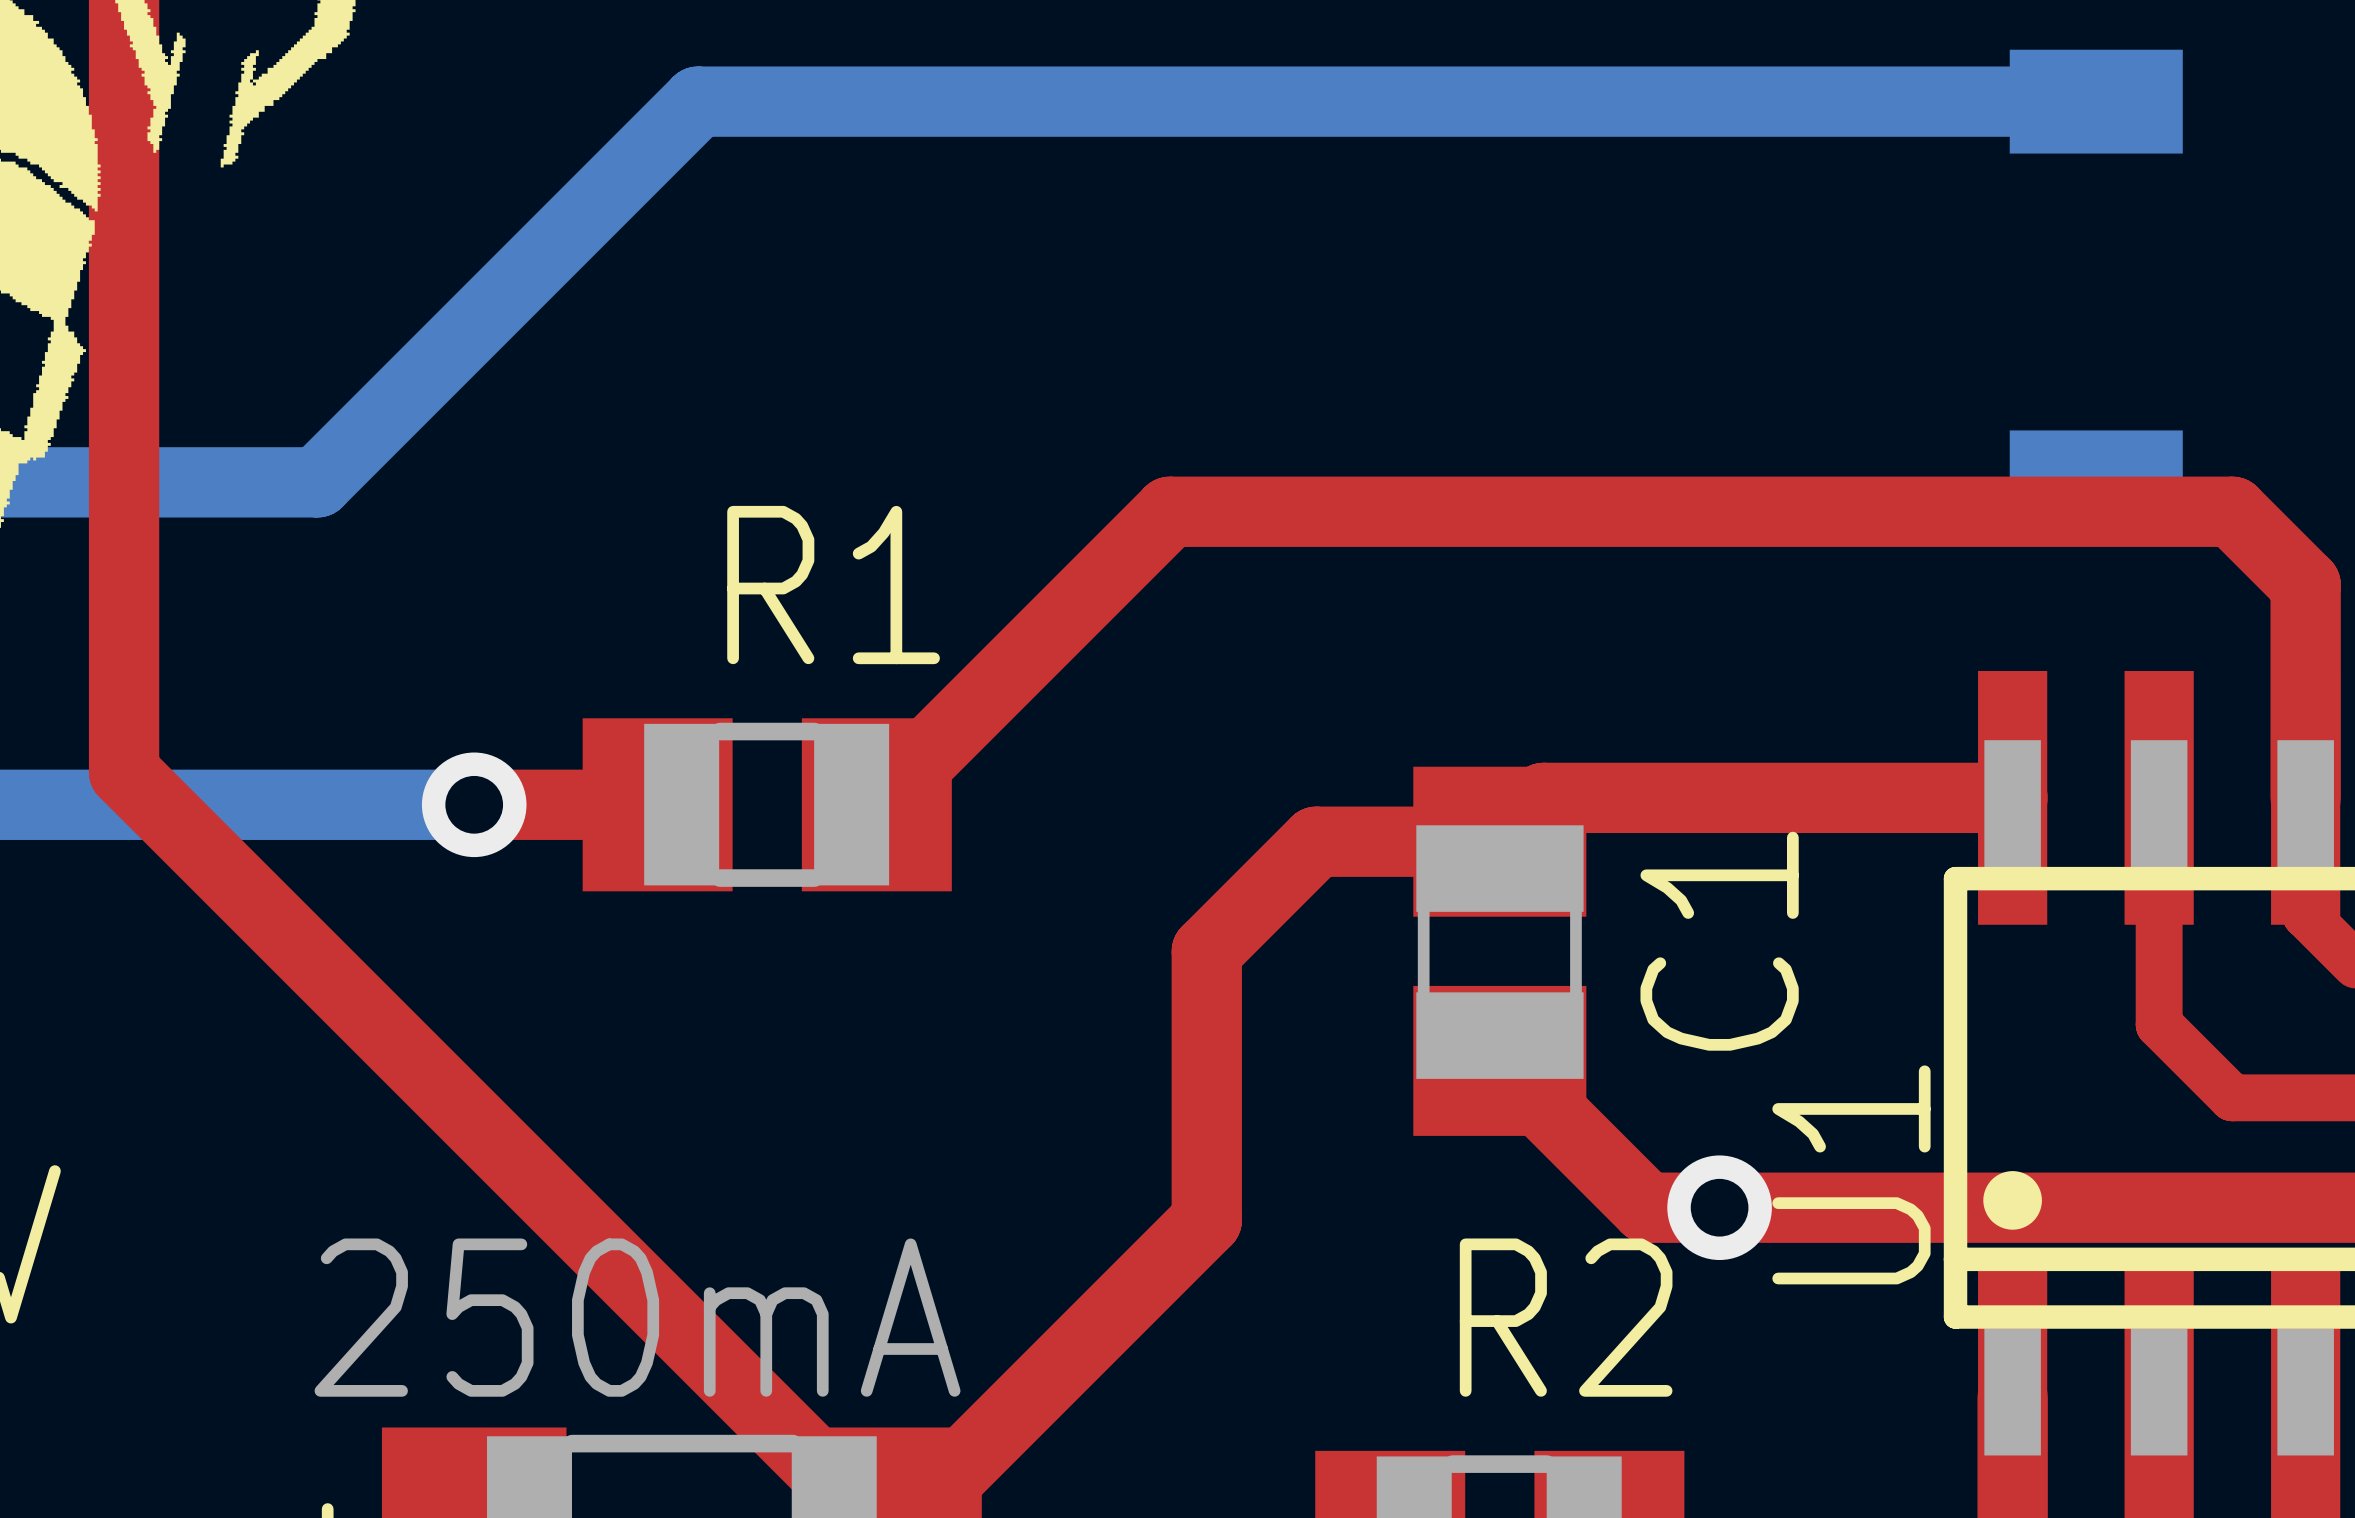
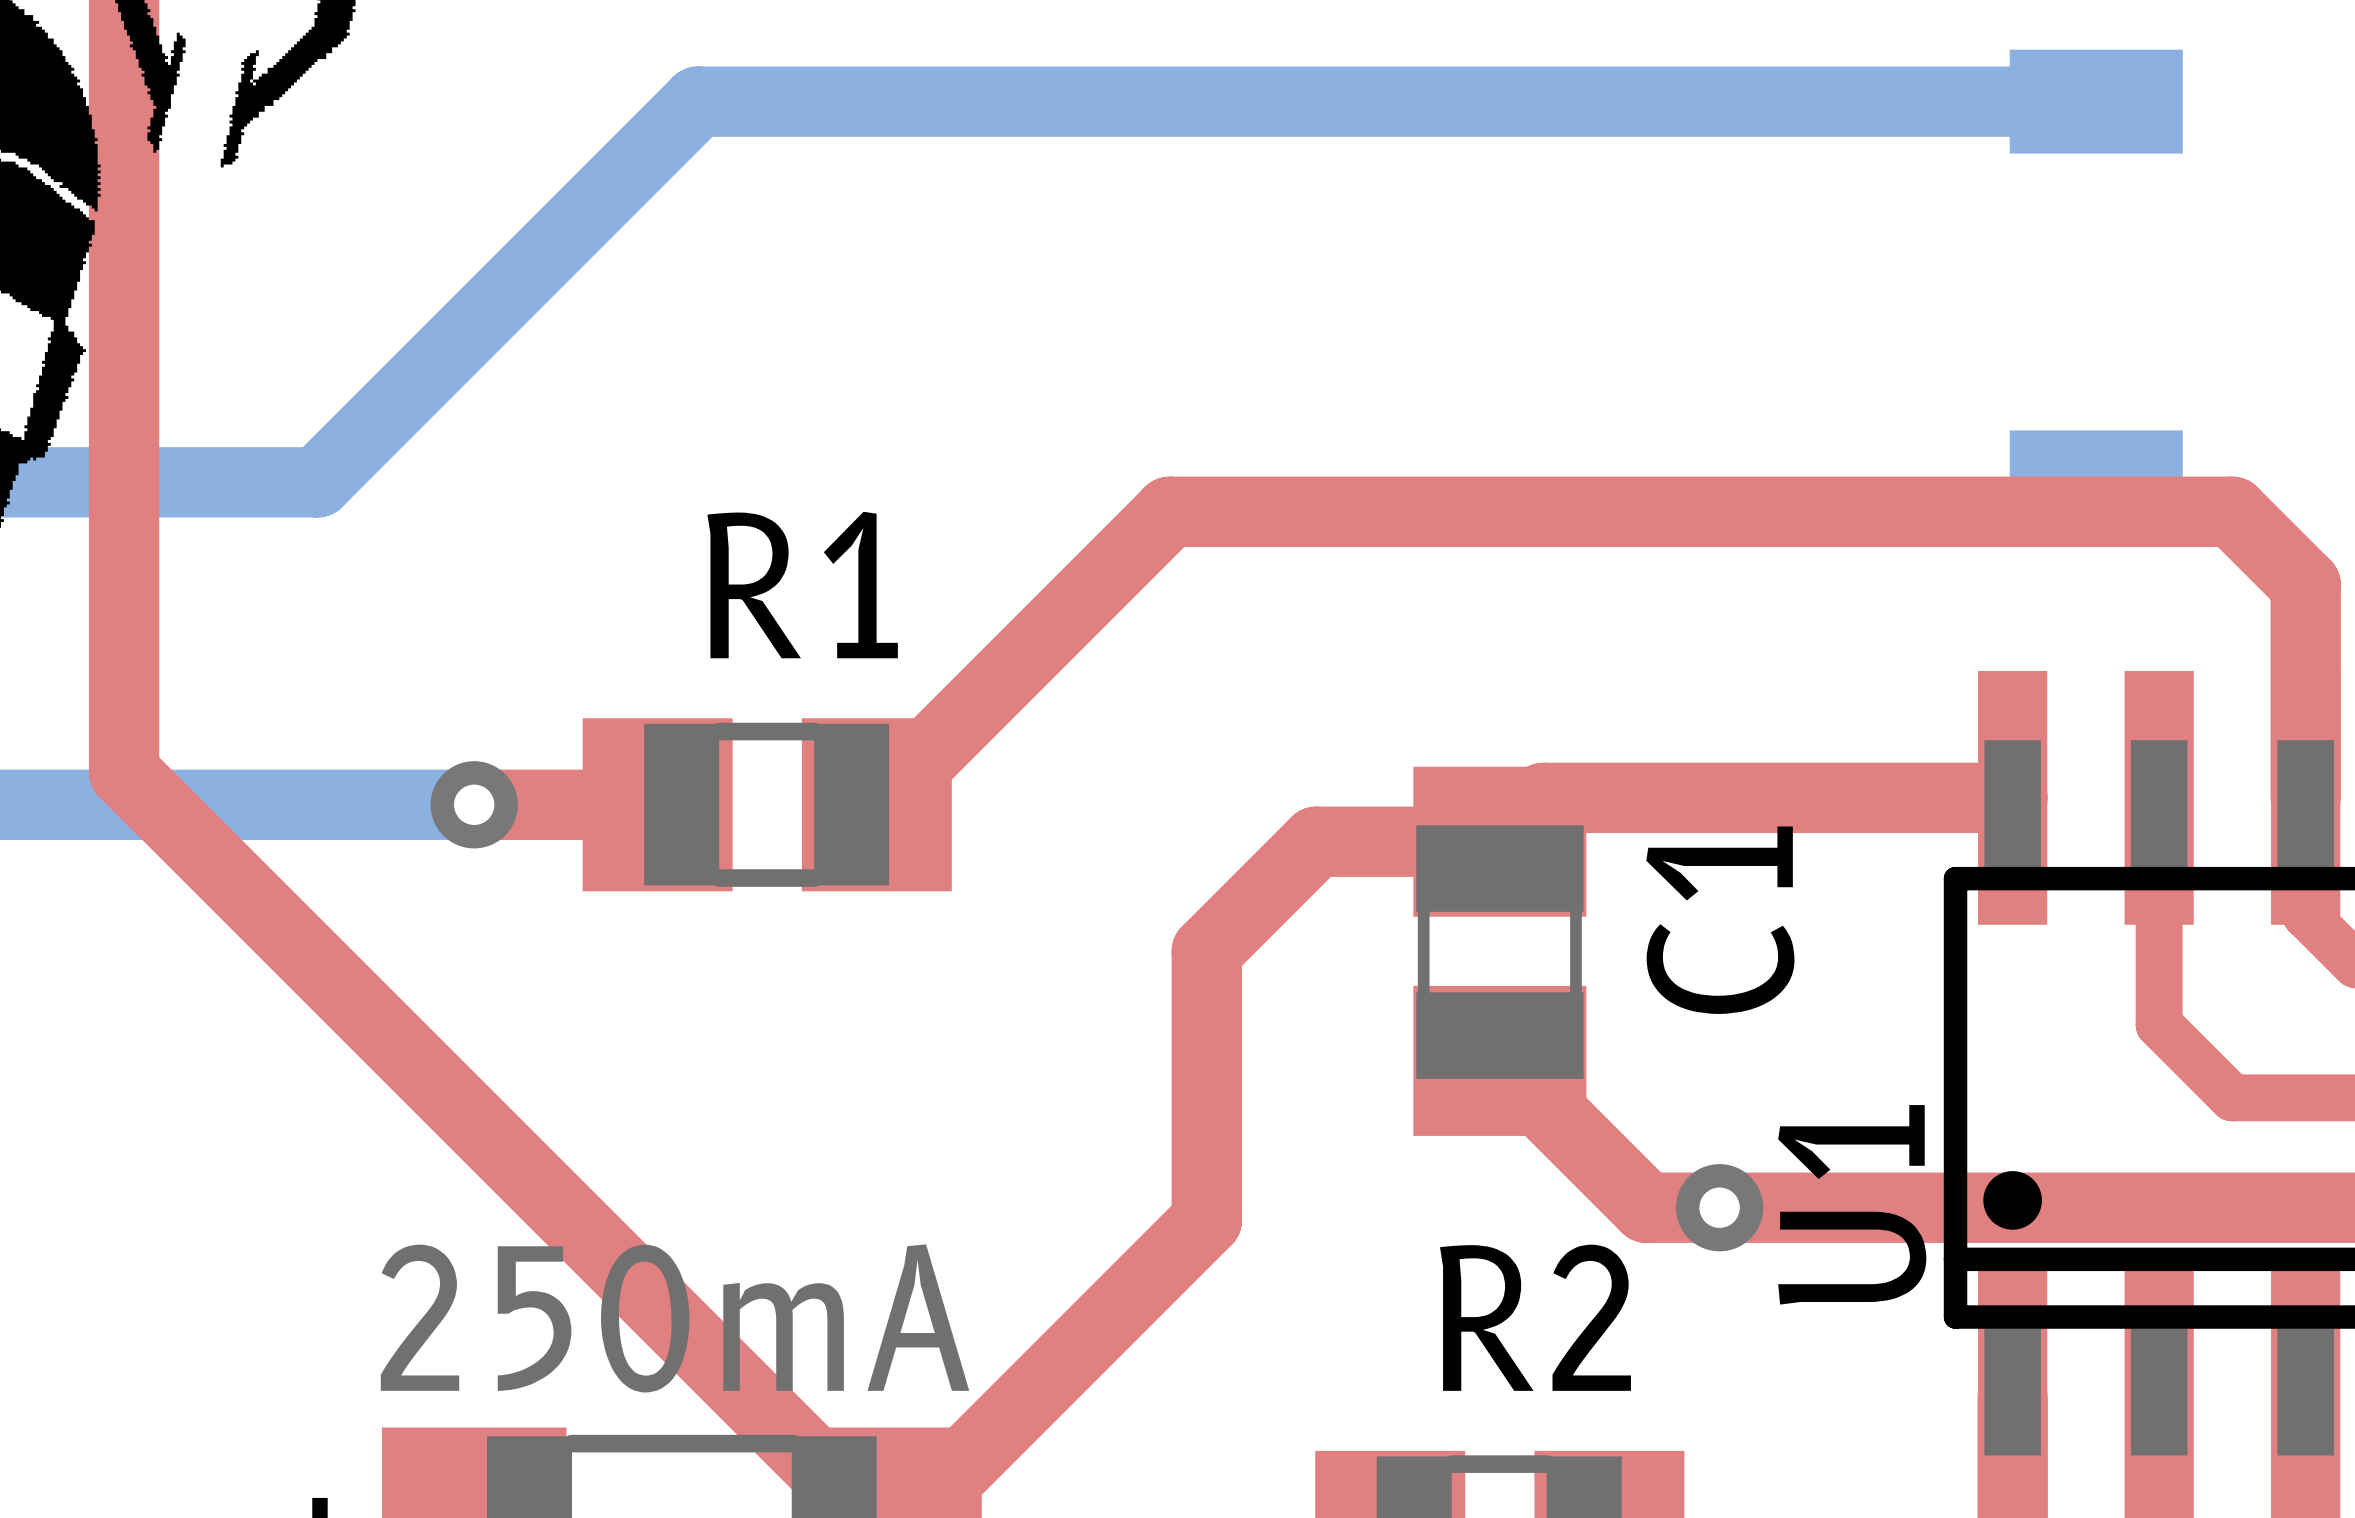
via size: [421, 752, 527, 858] -> [430, 761, 518, 849]
via size: [1667, 1155, 1772, 1261] -> [1675, 1164, 1764, 1252]

